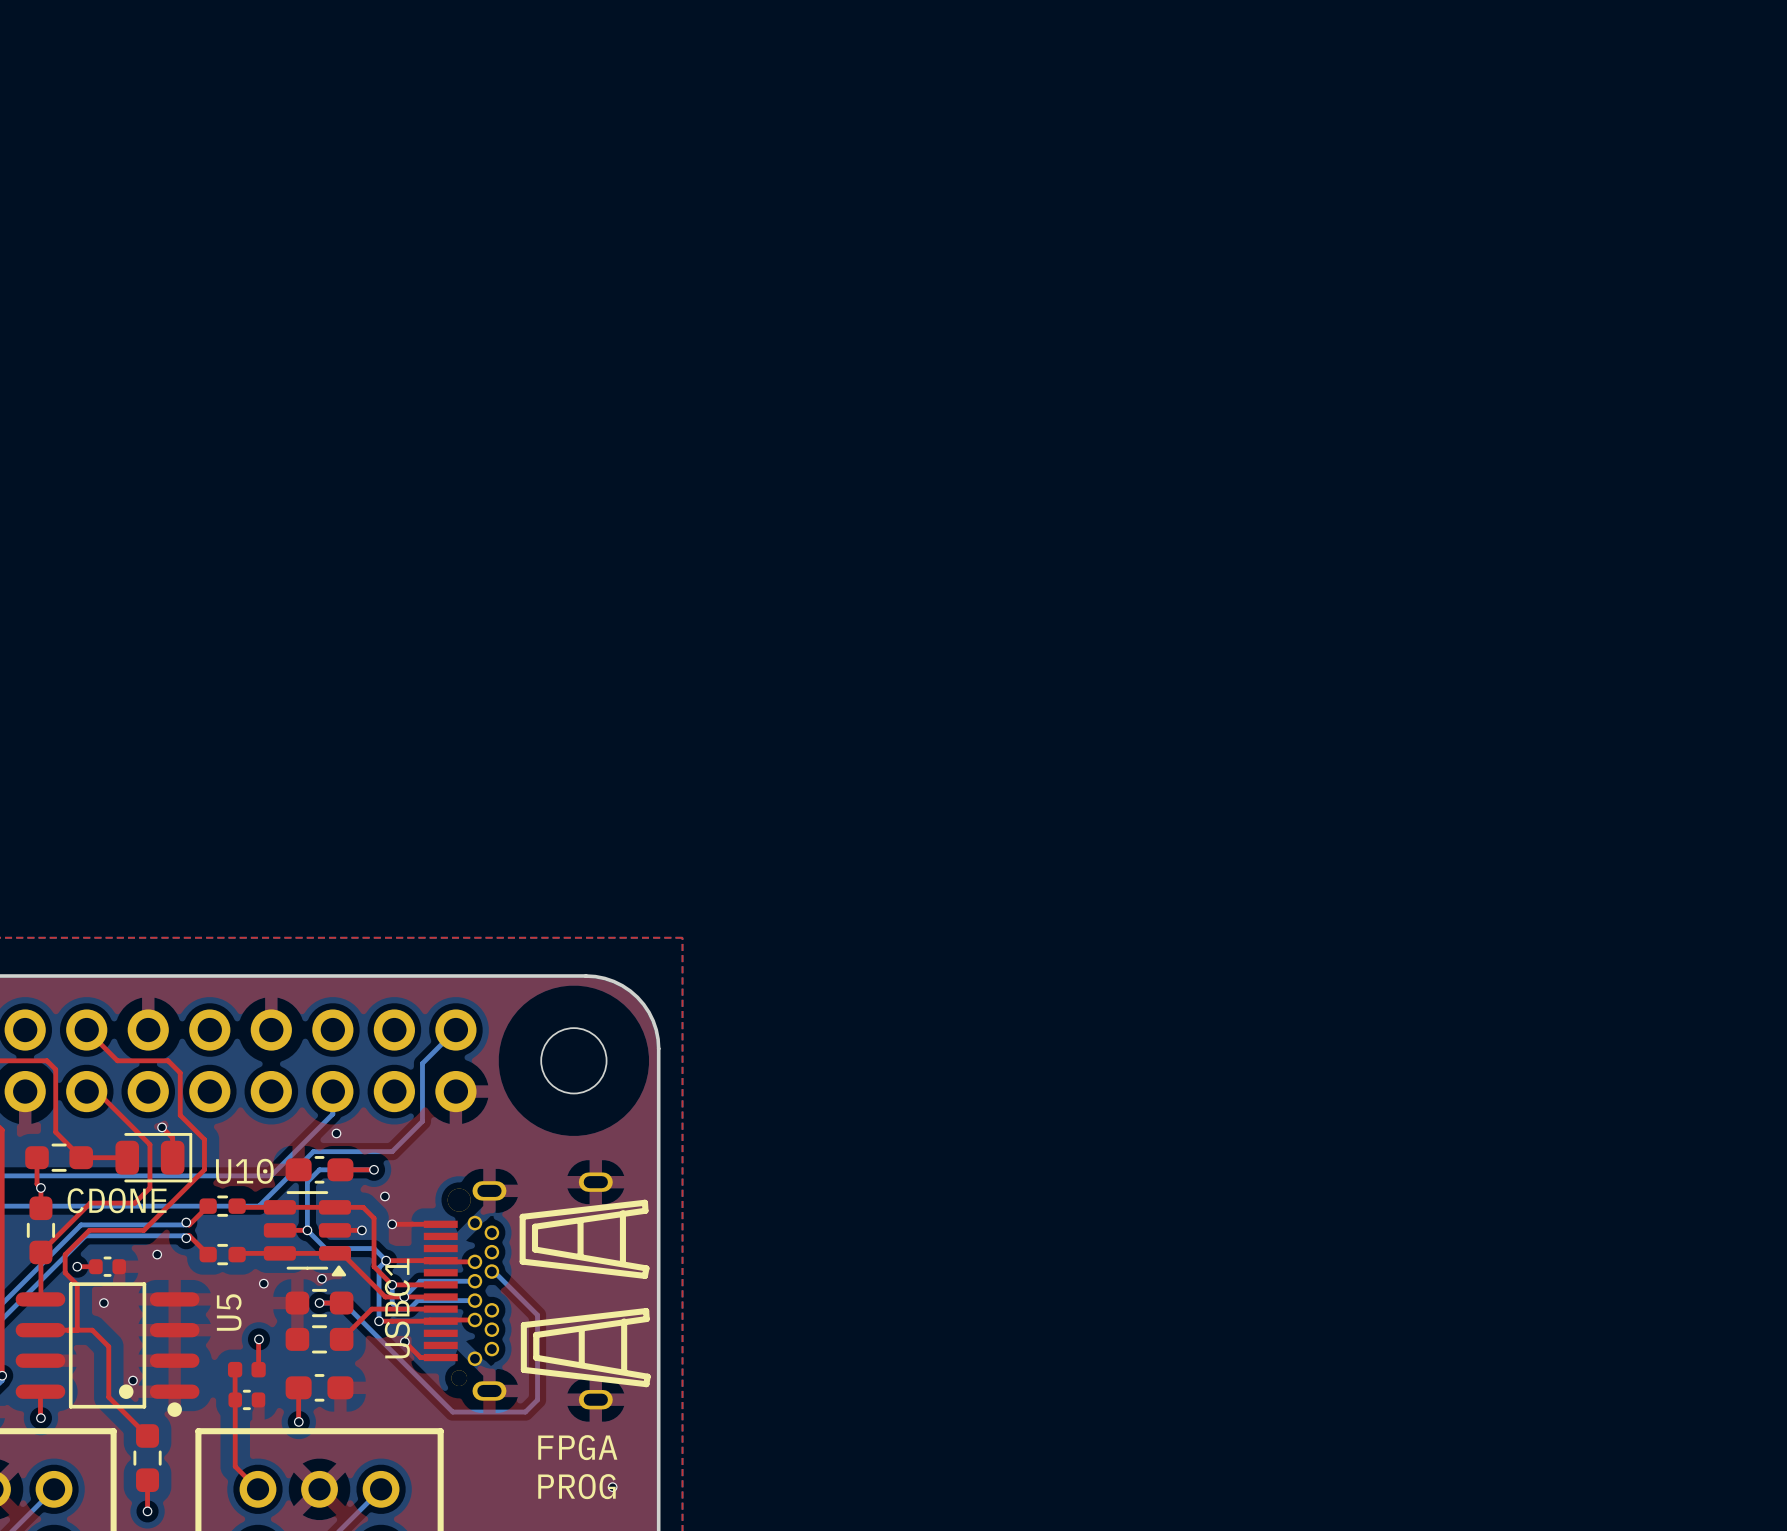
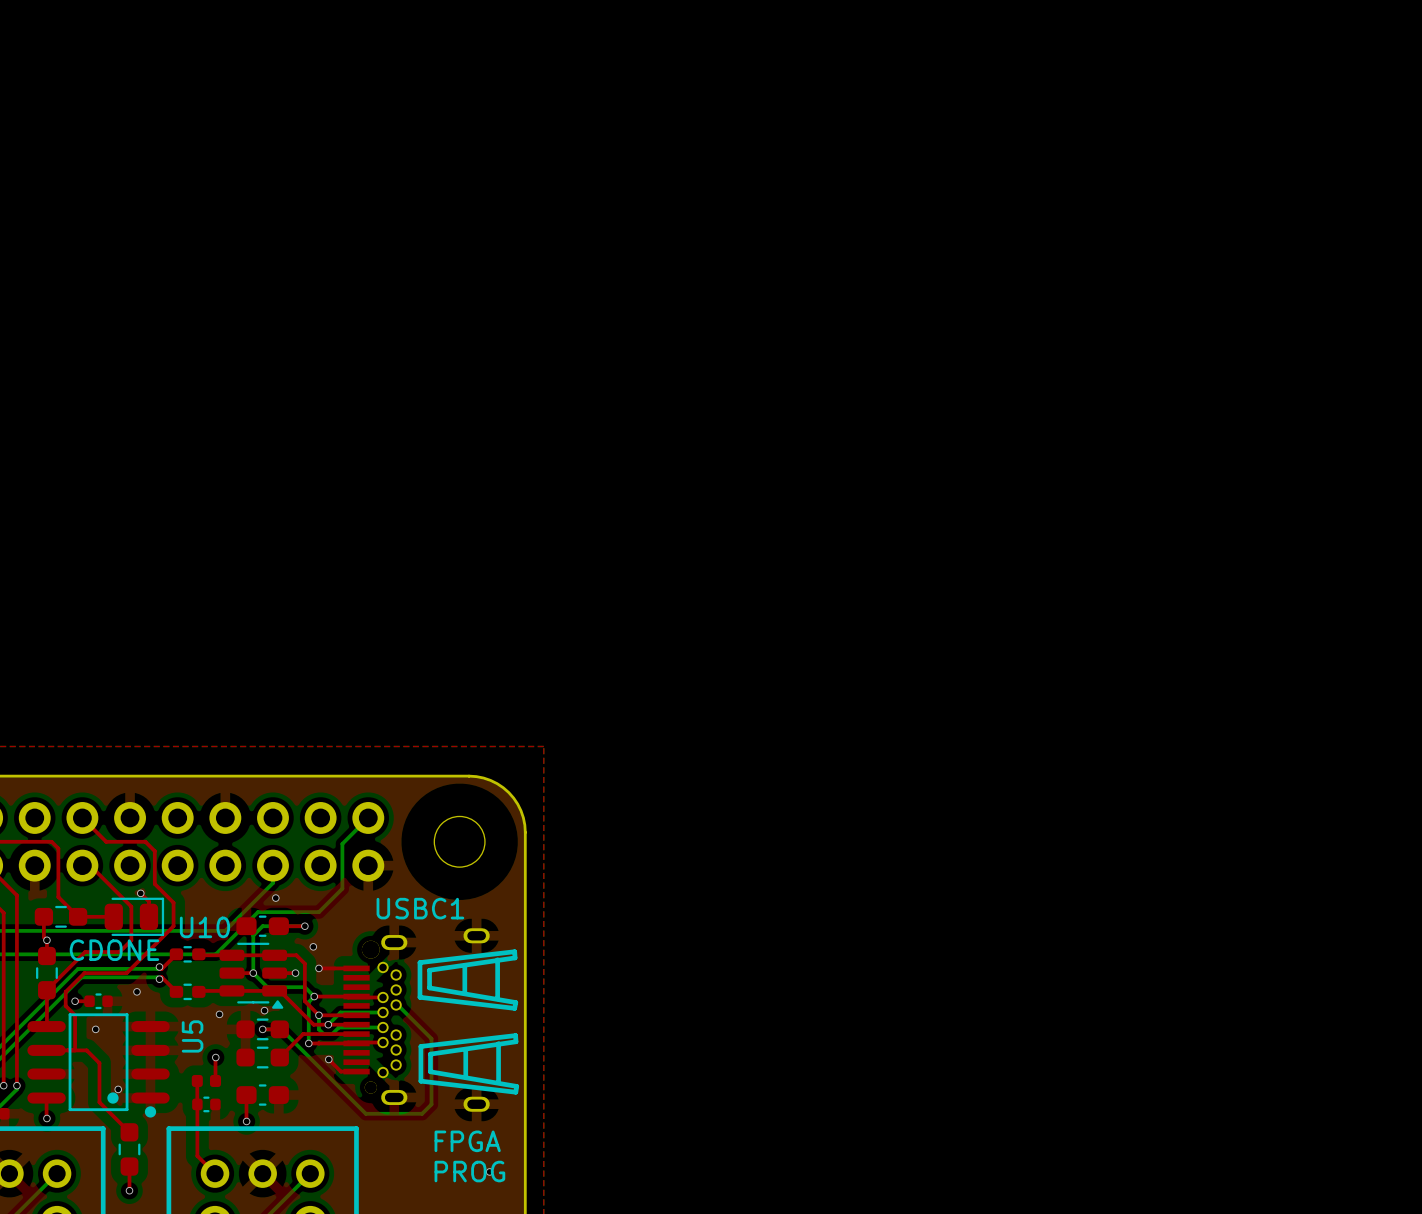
USBC1 name rotation: 0° (397, 1308) -> 90° clockwise (420, 908)
USBC1 name position: USBC1 (397, 1308) -> USBC1 (420, 908)

